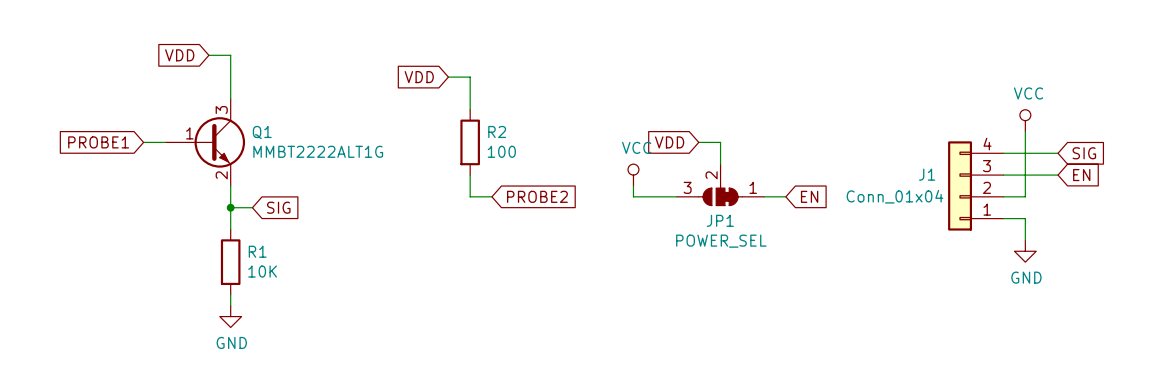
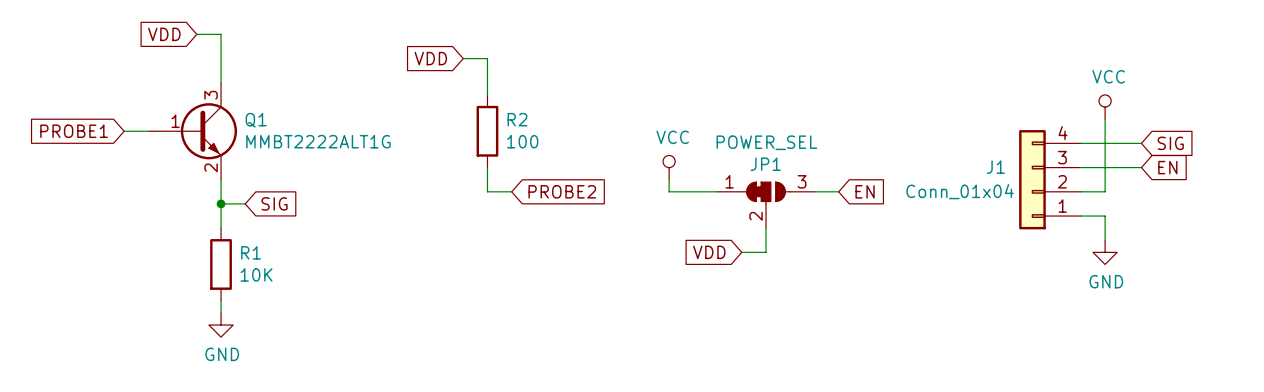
global label position: VDD (669, 142) -> VDD (709, 252)
wire: (698, 142) (720, 142) (720, 164) -> none
JP1 rotation: 0° (720, 195) -> 180° (766, 193)
wire: none -> (766, 228) (766, 252) (741, 252)

